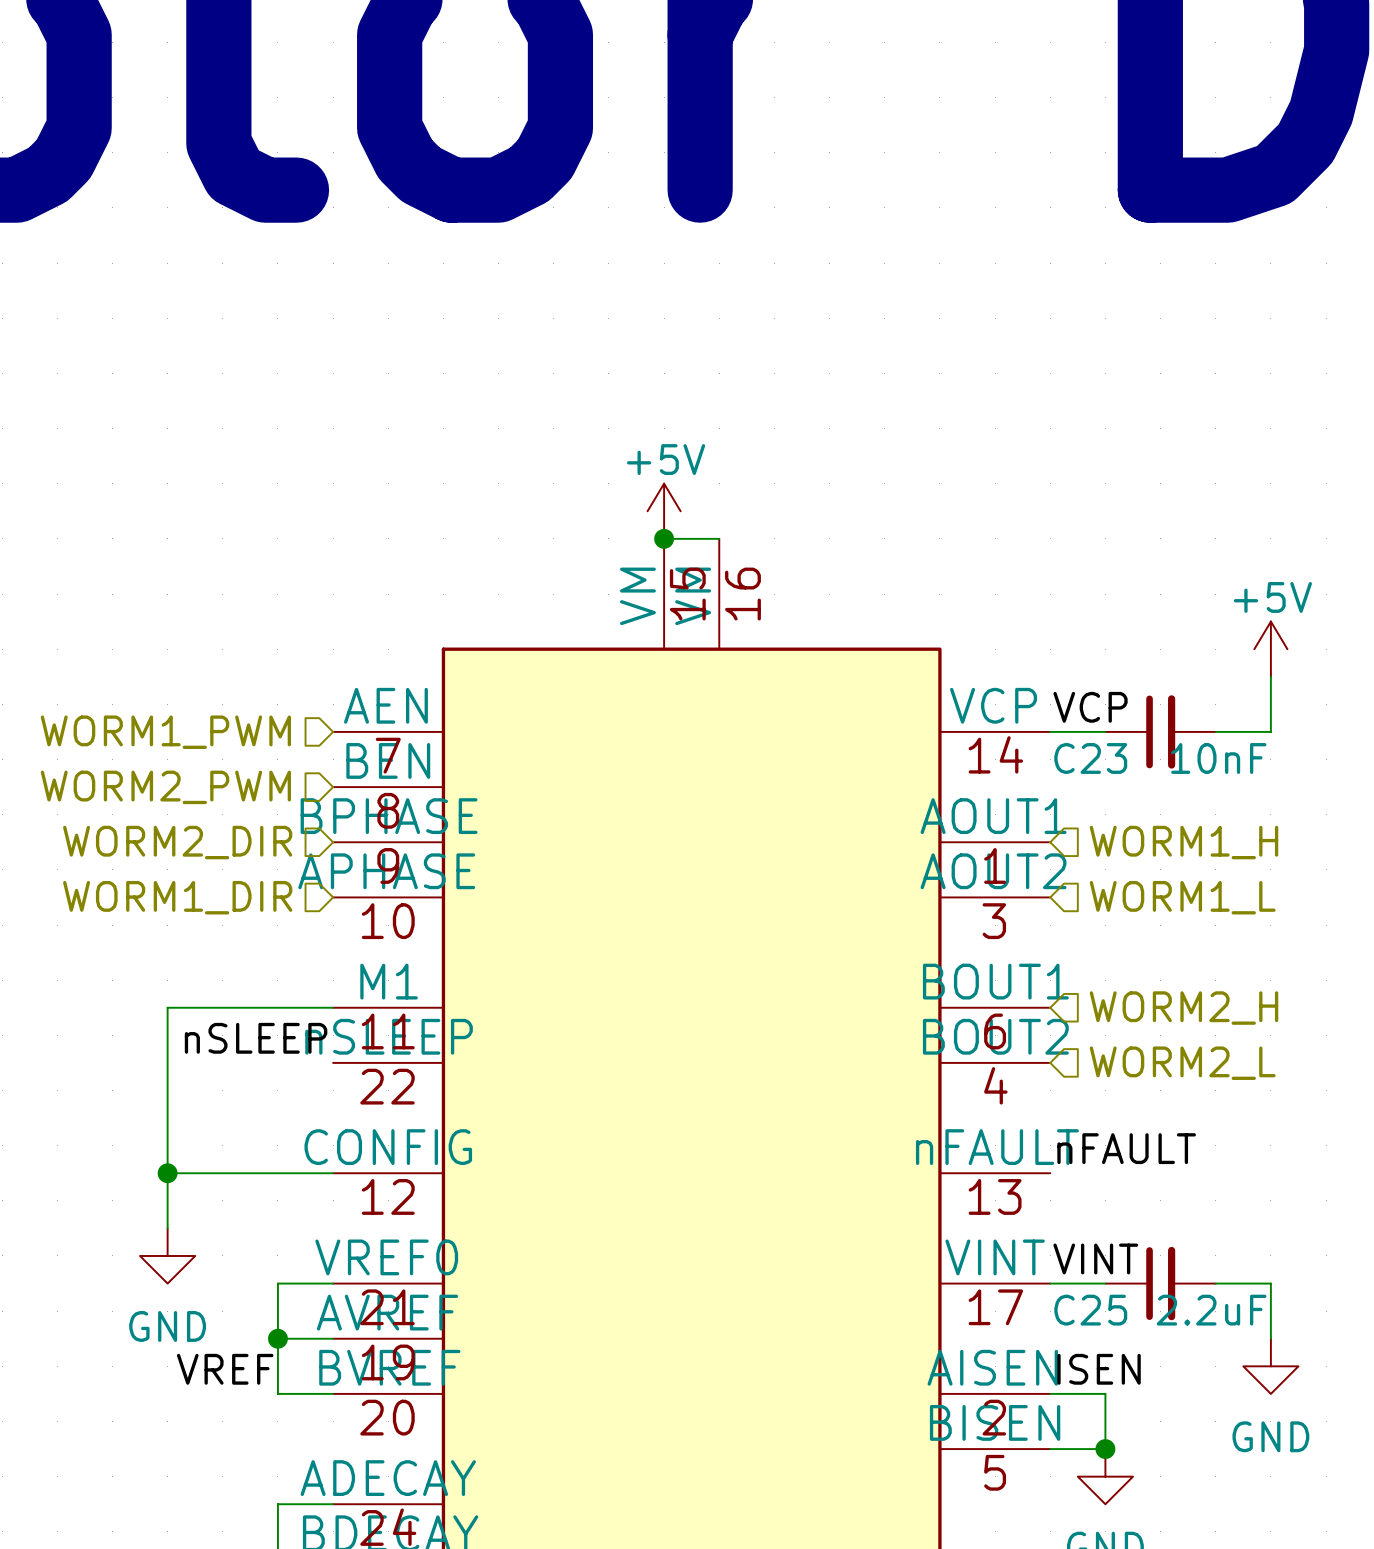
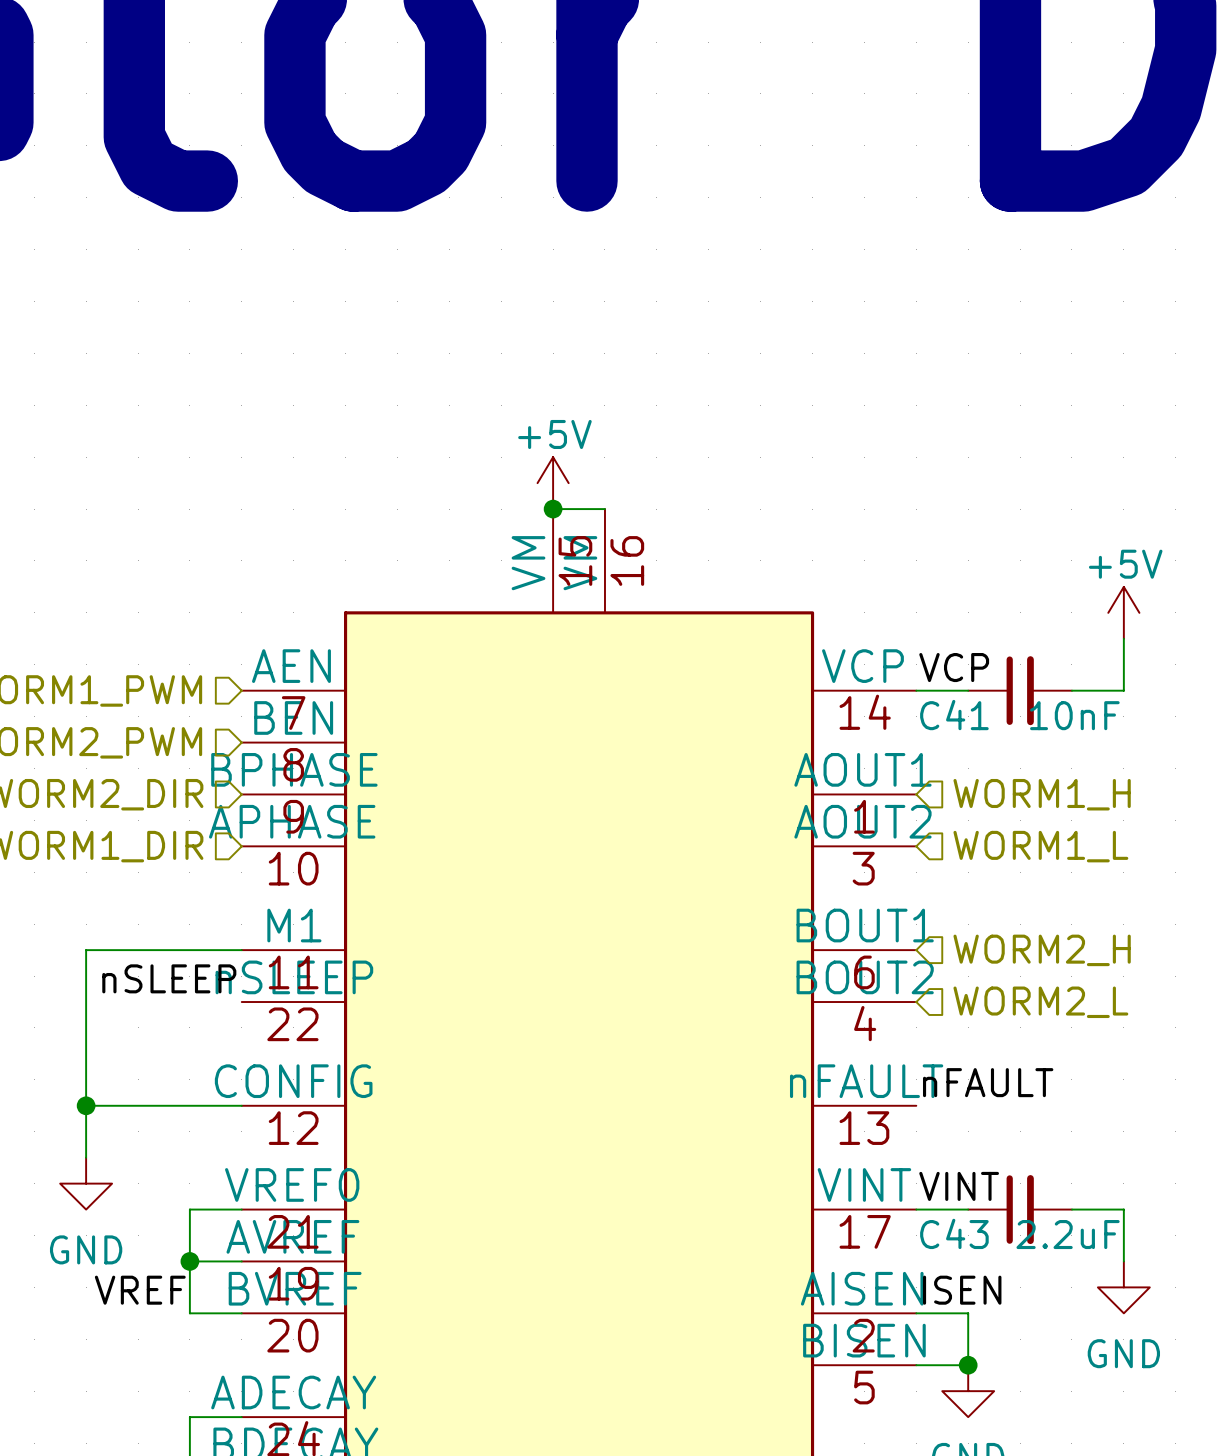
C23 name: C23 (1090, 758) -> C41 (954, 715)
C25 name: C25 (1090, 1310) -> C43 (954, 1233)

